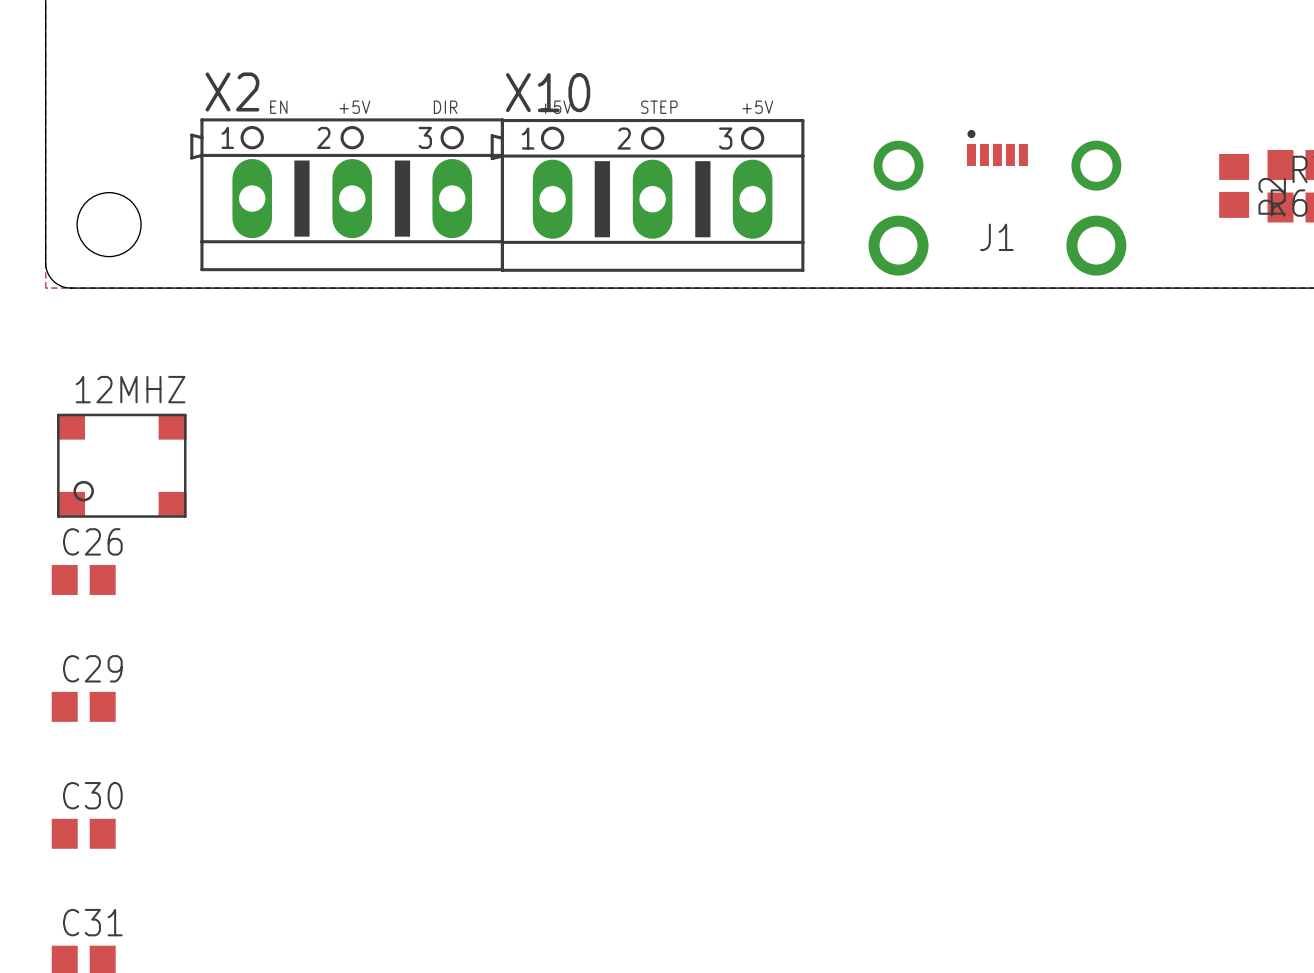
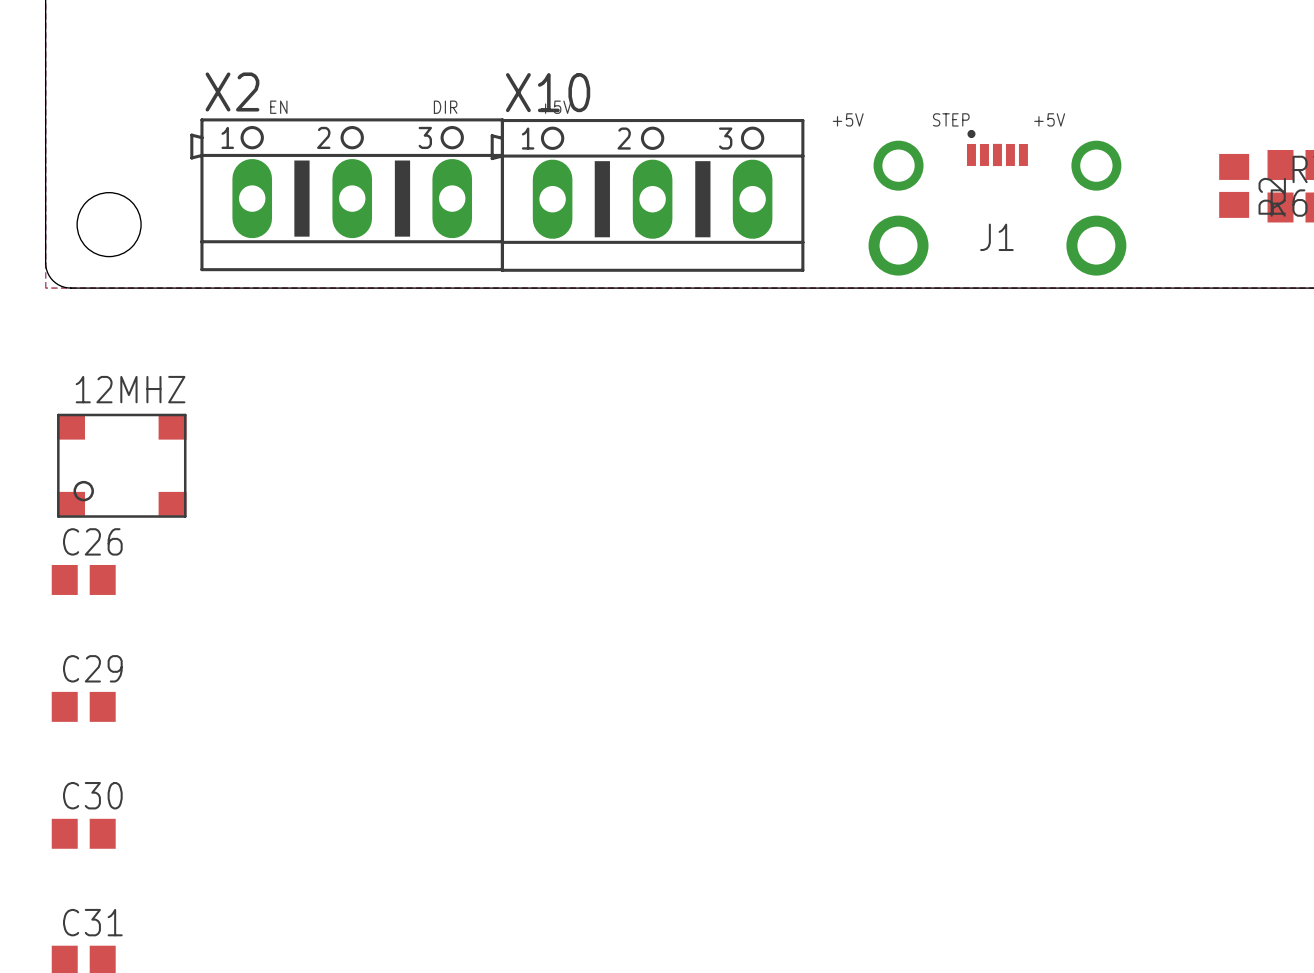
text: +5V (354, 107) -> none
text position: STEP (659, 107) -> STEP (951, 119)
text position: +5V (757, 107) -> +5V (848, 119)
text: none -> +5V (1049, 119)

